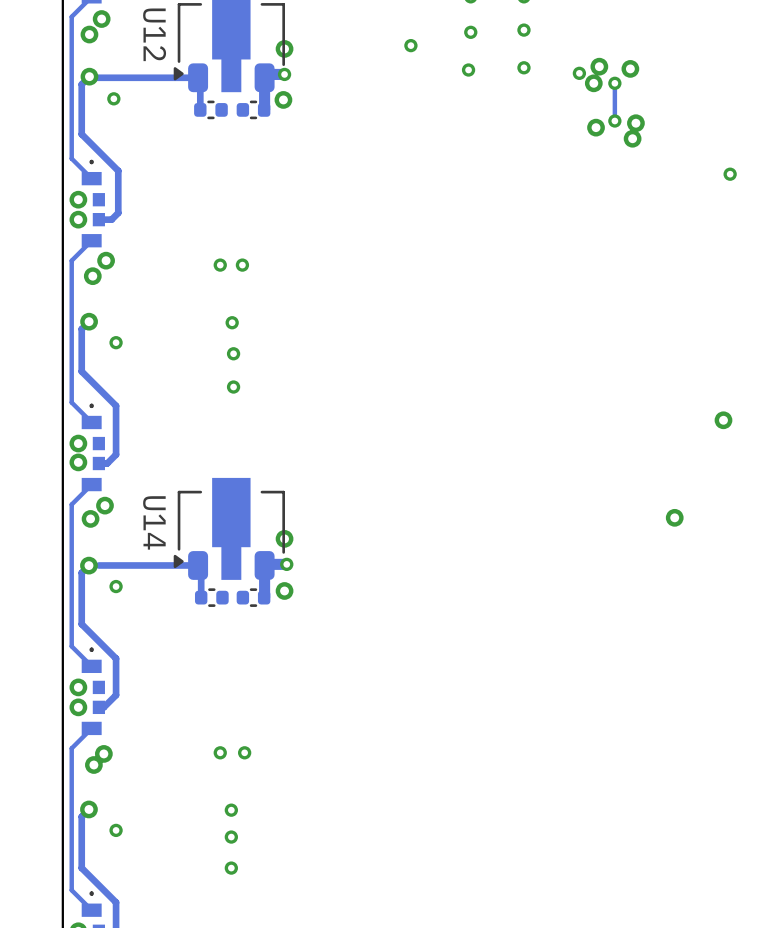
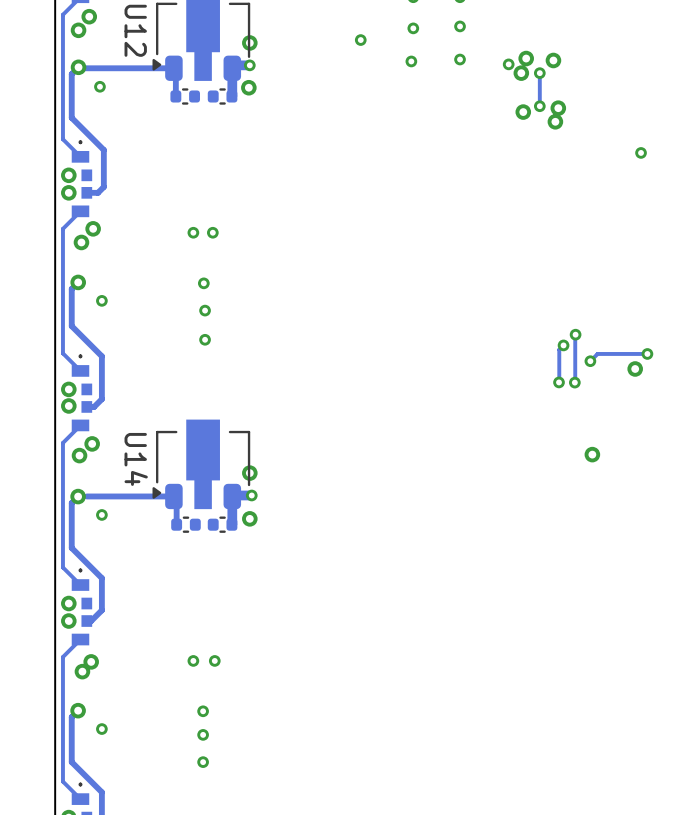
track: none -> (575, 334) (574, 382)
via: none -> (575, 334)
track: none -> (563, 345) (559, 349) (559, 382)
via: none -> (563, 345)
track: none -> (647, 353) (597, 353) (590, 361)
via: none -> (647, 353)
via: none -> (590, 361)
via: none -> (559, 382)
via: none -> (574, 382)

